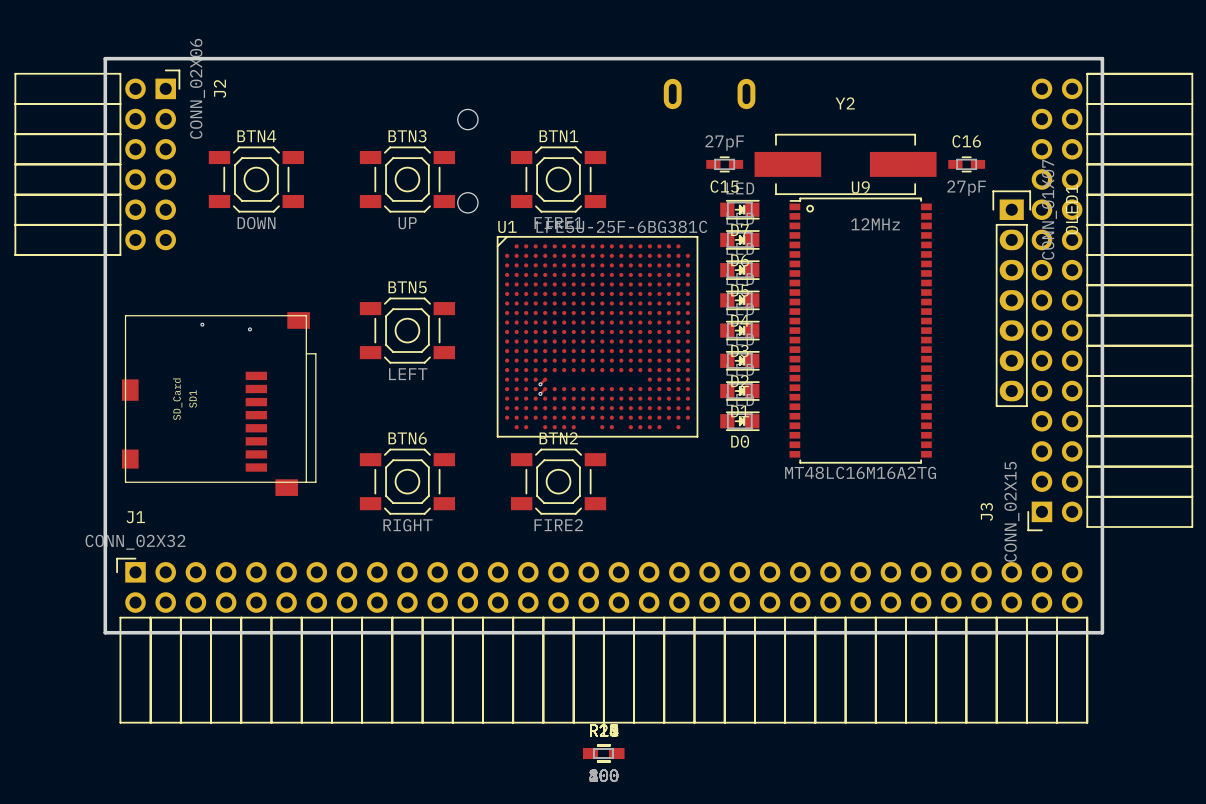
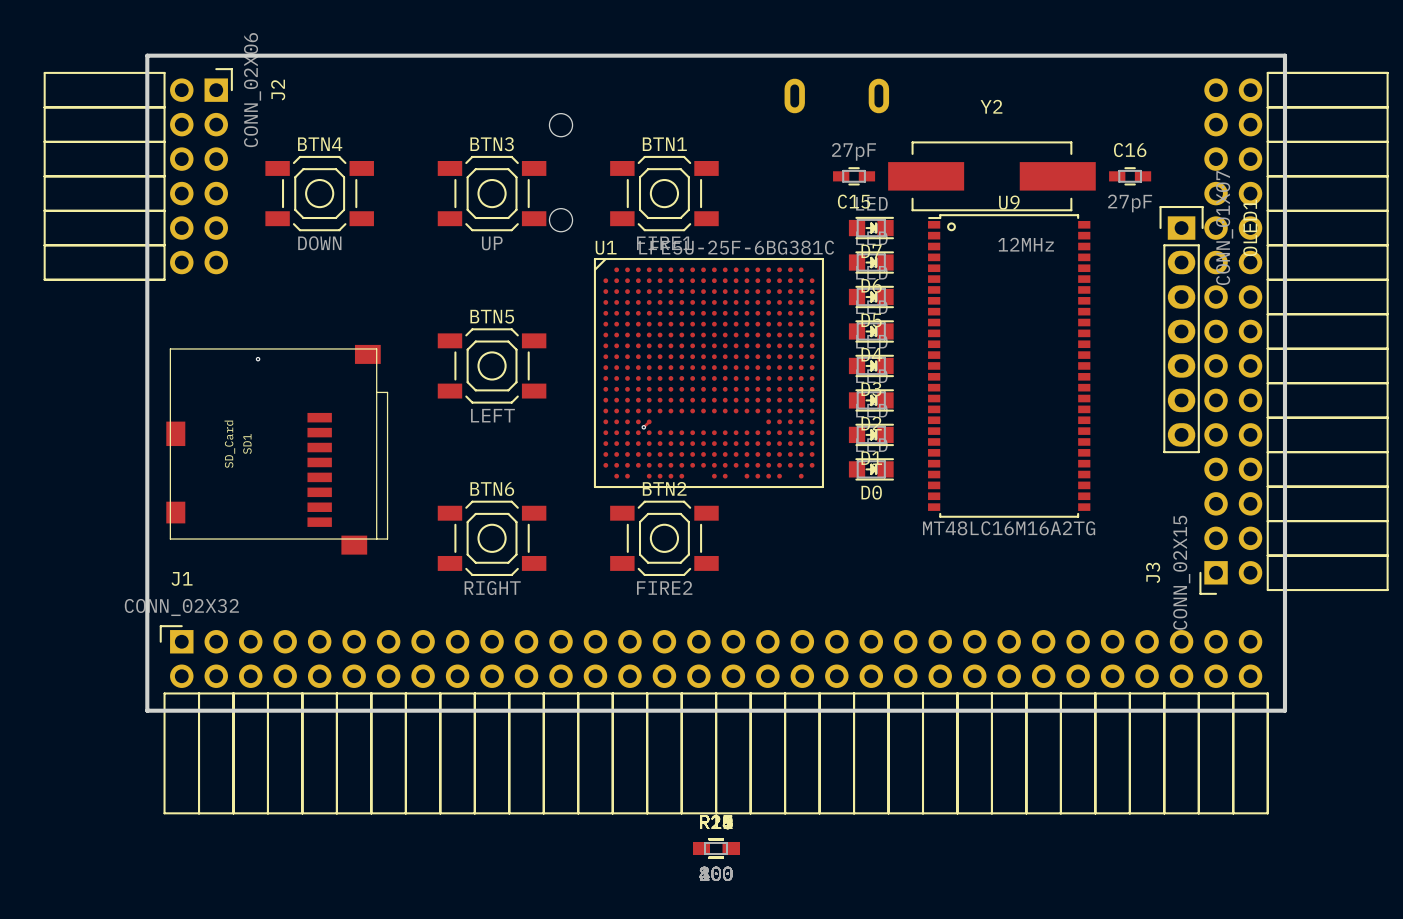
via: (249, 329) -> none
track: (545, 389) (540, 393) -> none
via: (540, 393) -> none

